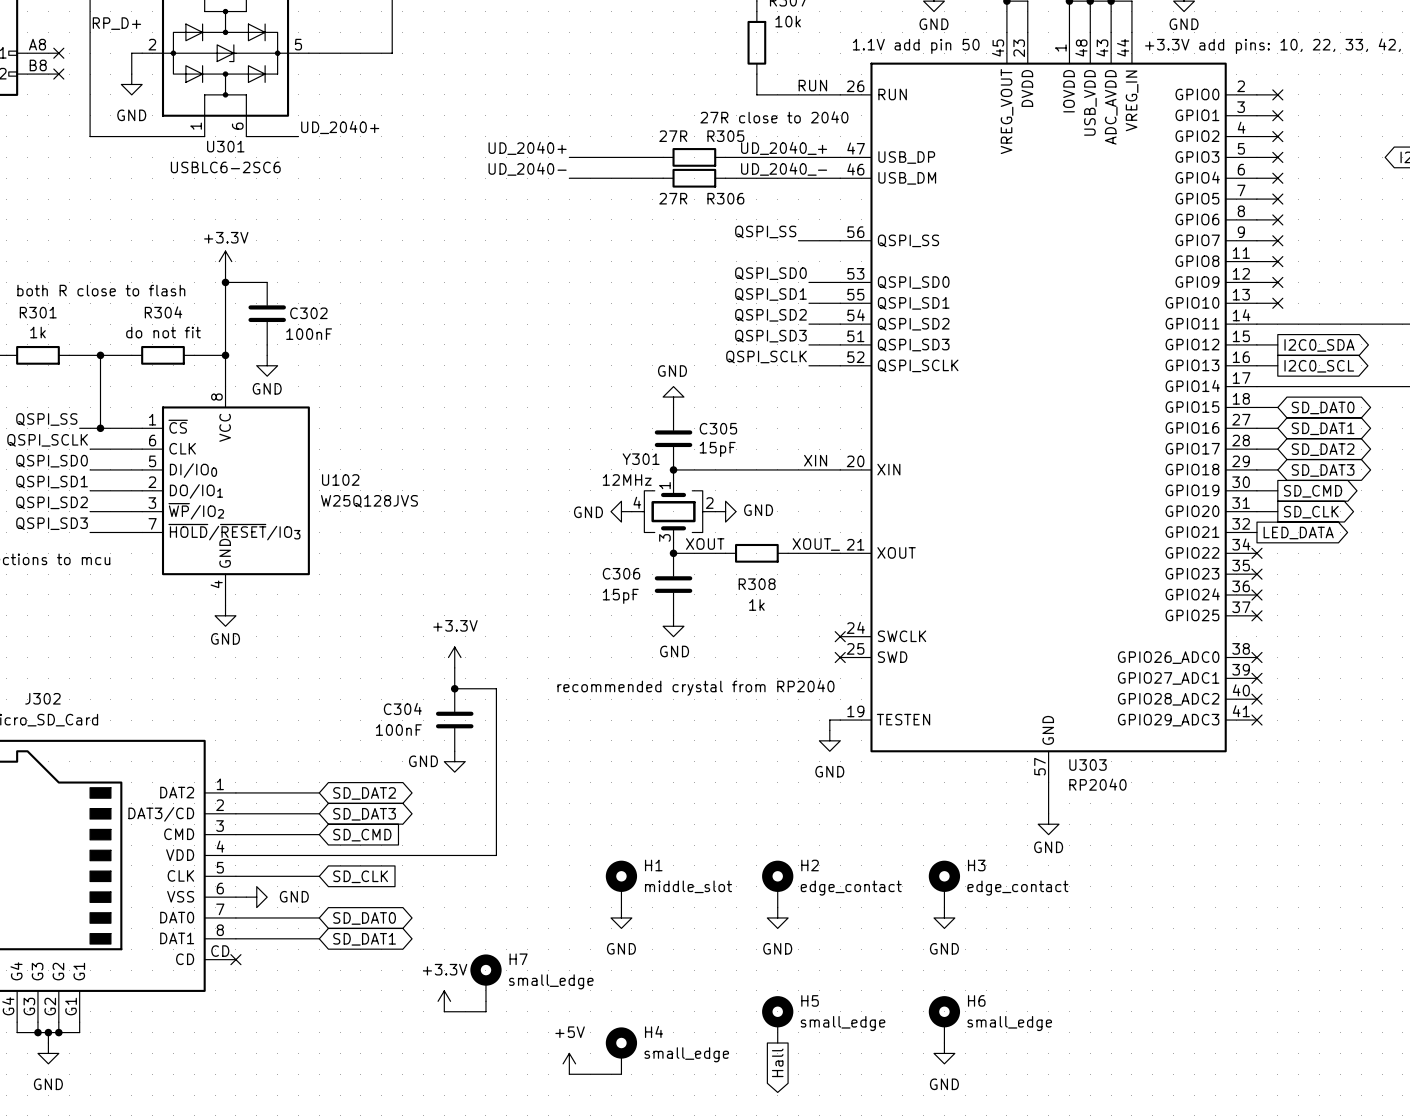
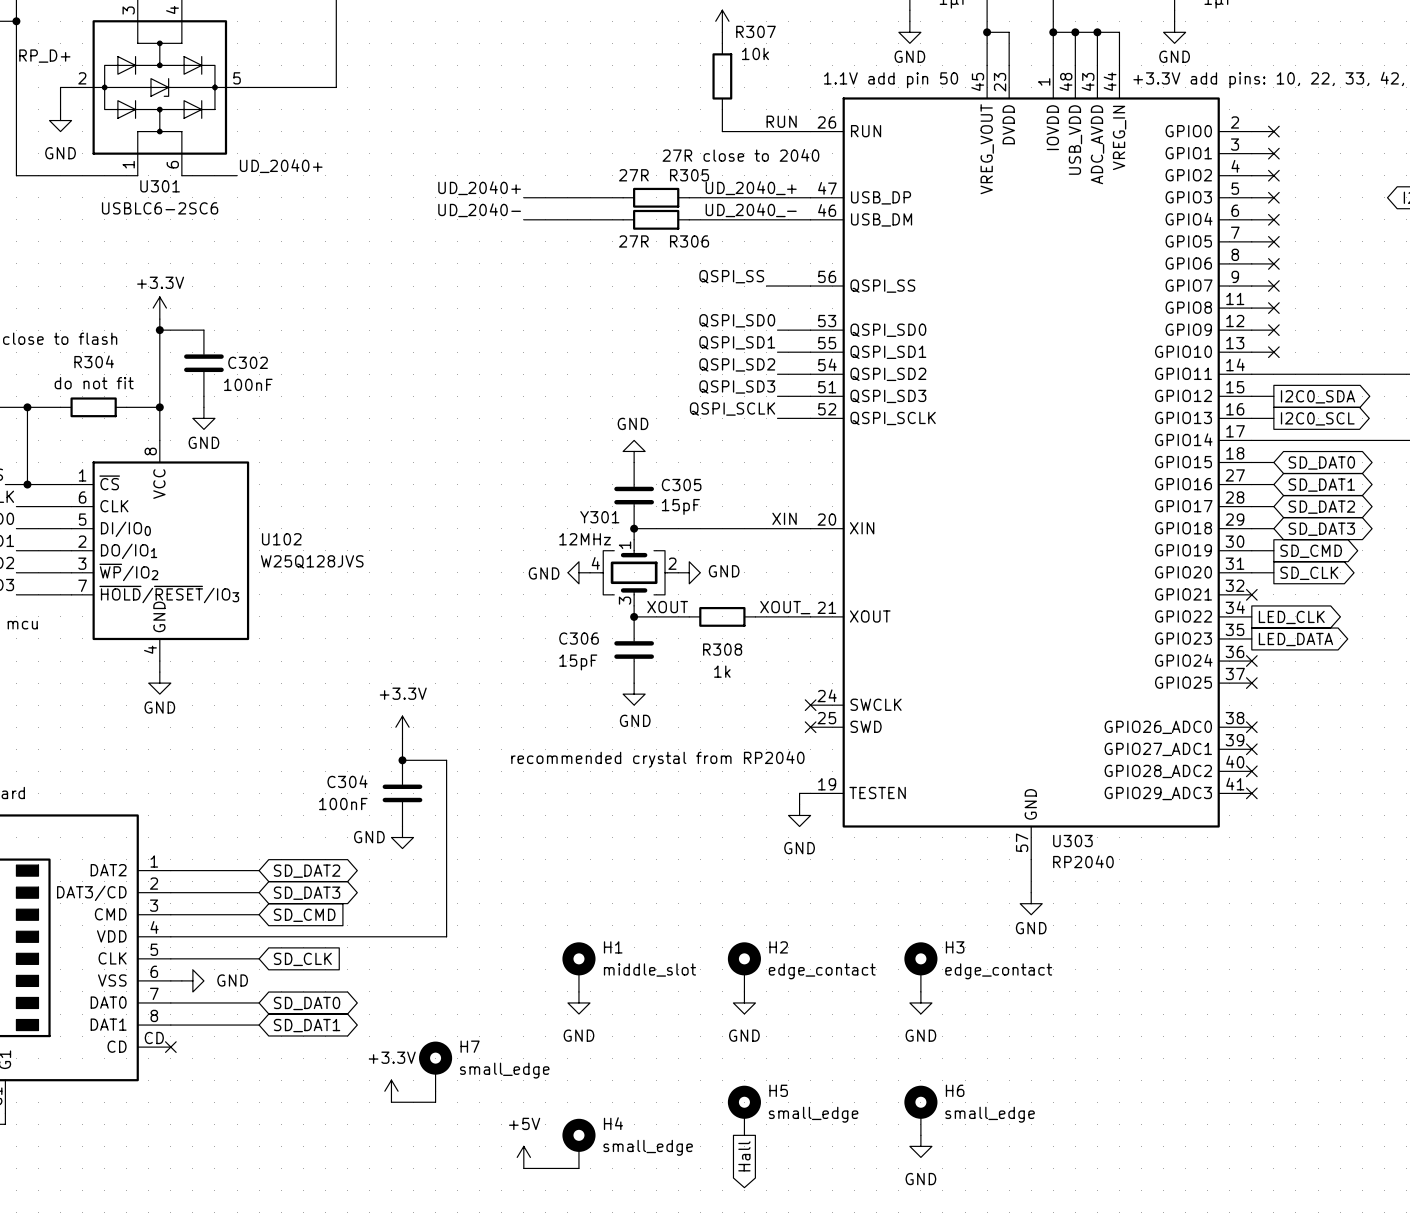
no-connect mark: none -> (1251, 594)
global label position: LED_DATA (1298, 532) -> LED_DATA (1295, 639)
no-connect mark: (1256, 553) -> none
global label: none -> LED_CLK (1291, 617)
no-connect mark: (1256, 574) -> none

